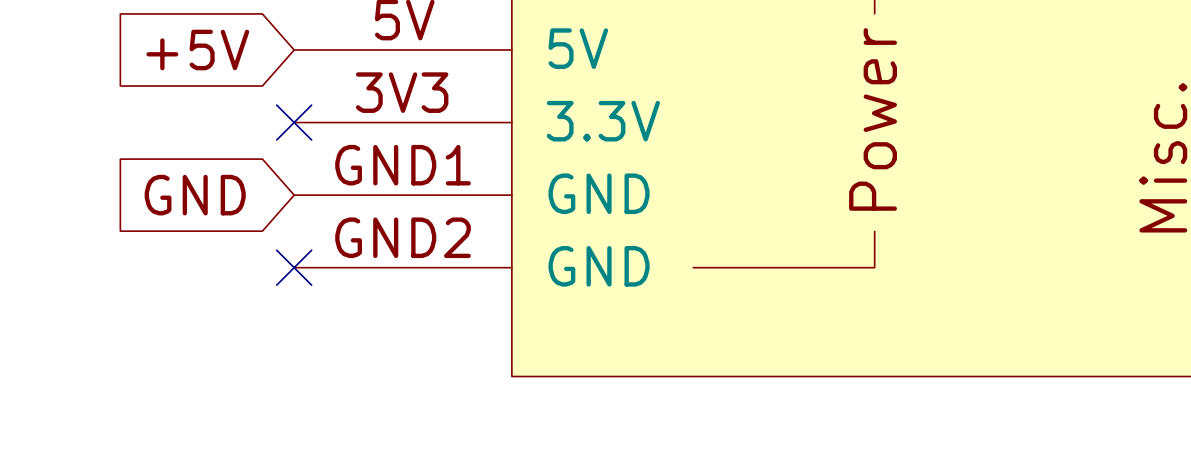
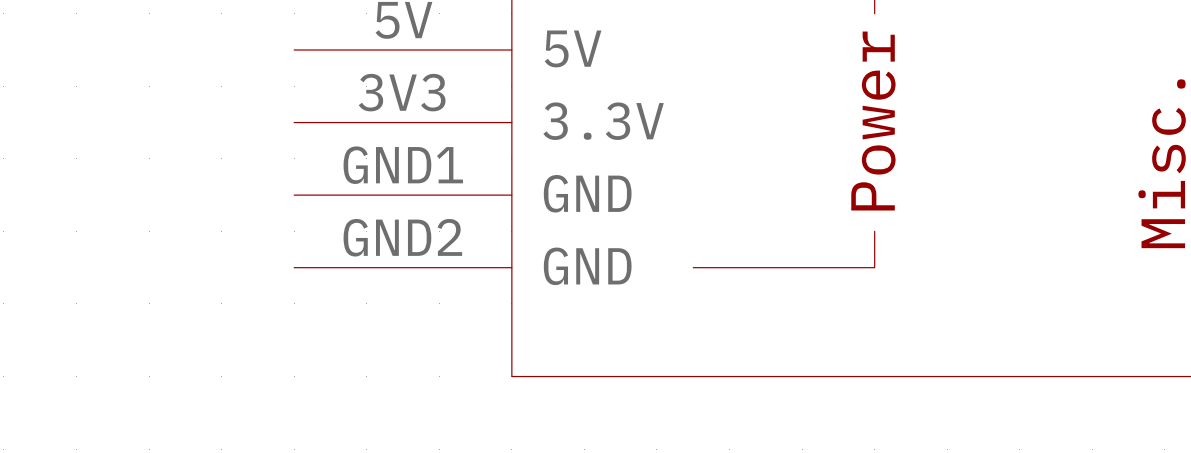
global label: +5V (197, 49) -> none
no-connect mark: (294, 122) -> none
global label: GND (195, 195) -> none
no-connect mark: (294, 267) -> none

